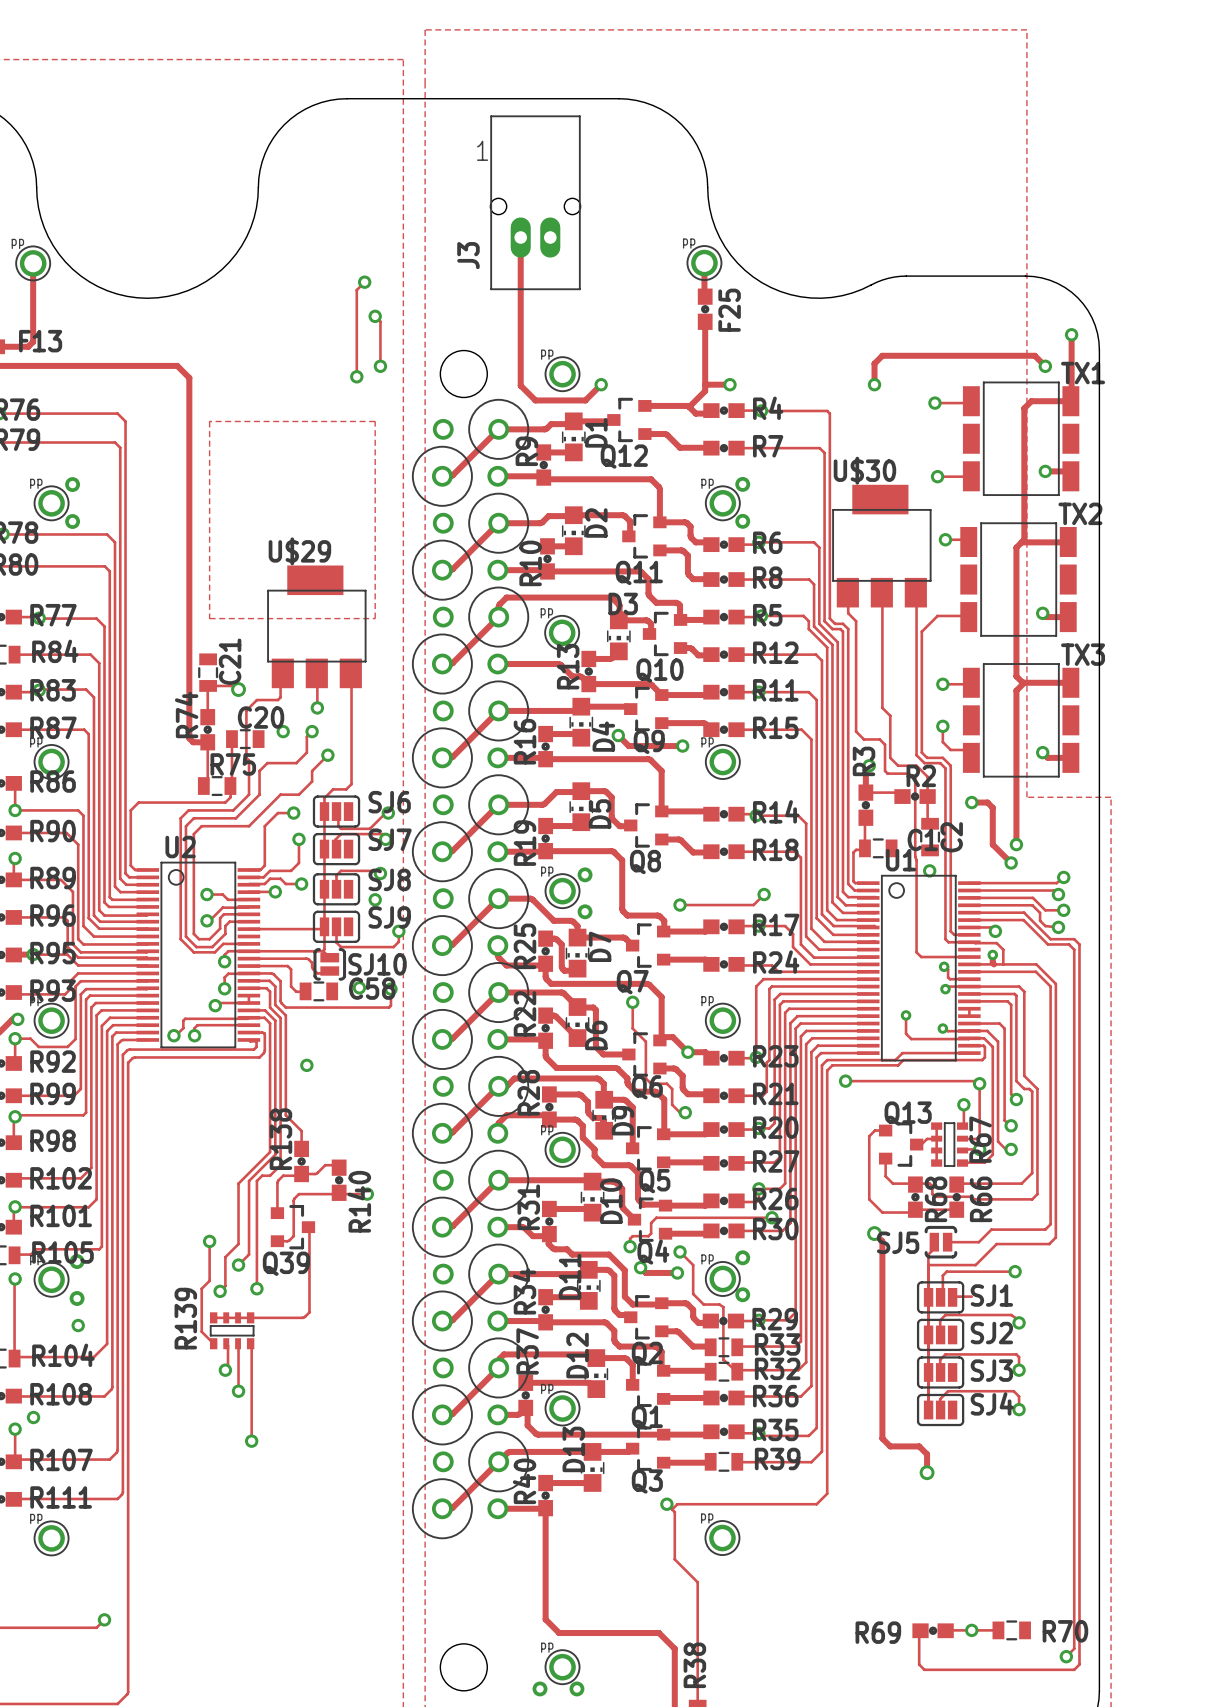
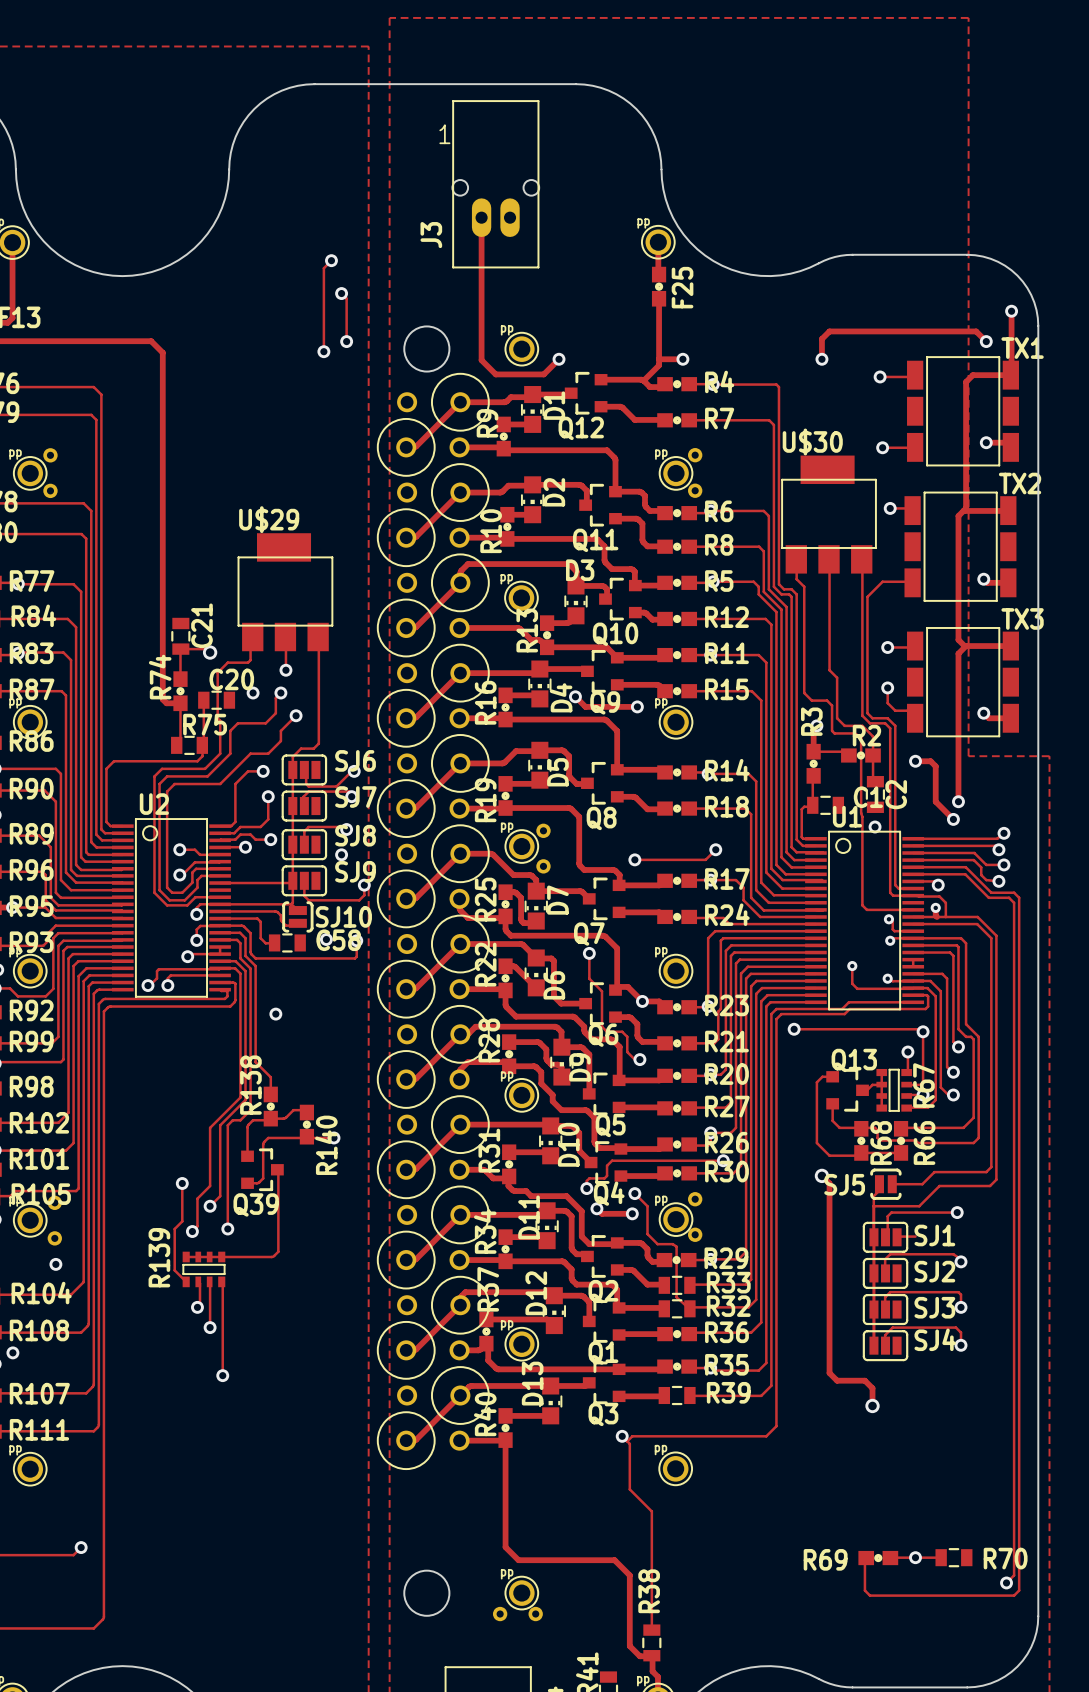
zone outline: (209, 421) (375, 421) (375, 618) (209, 618) (209, 421) -> none

